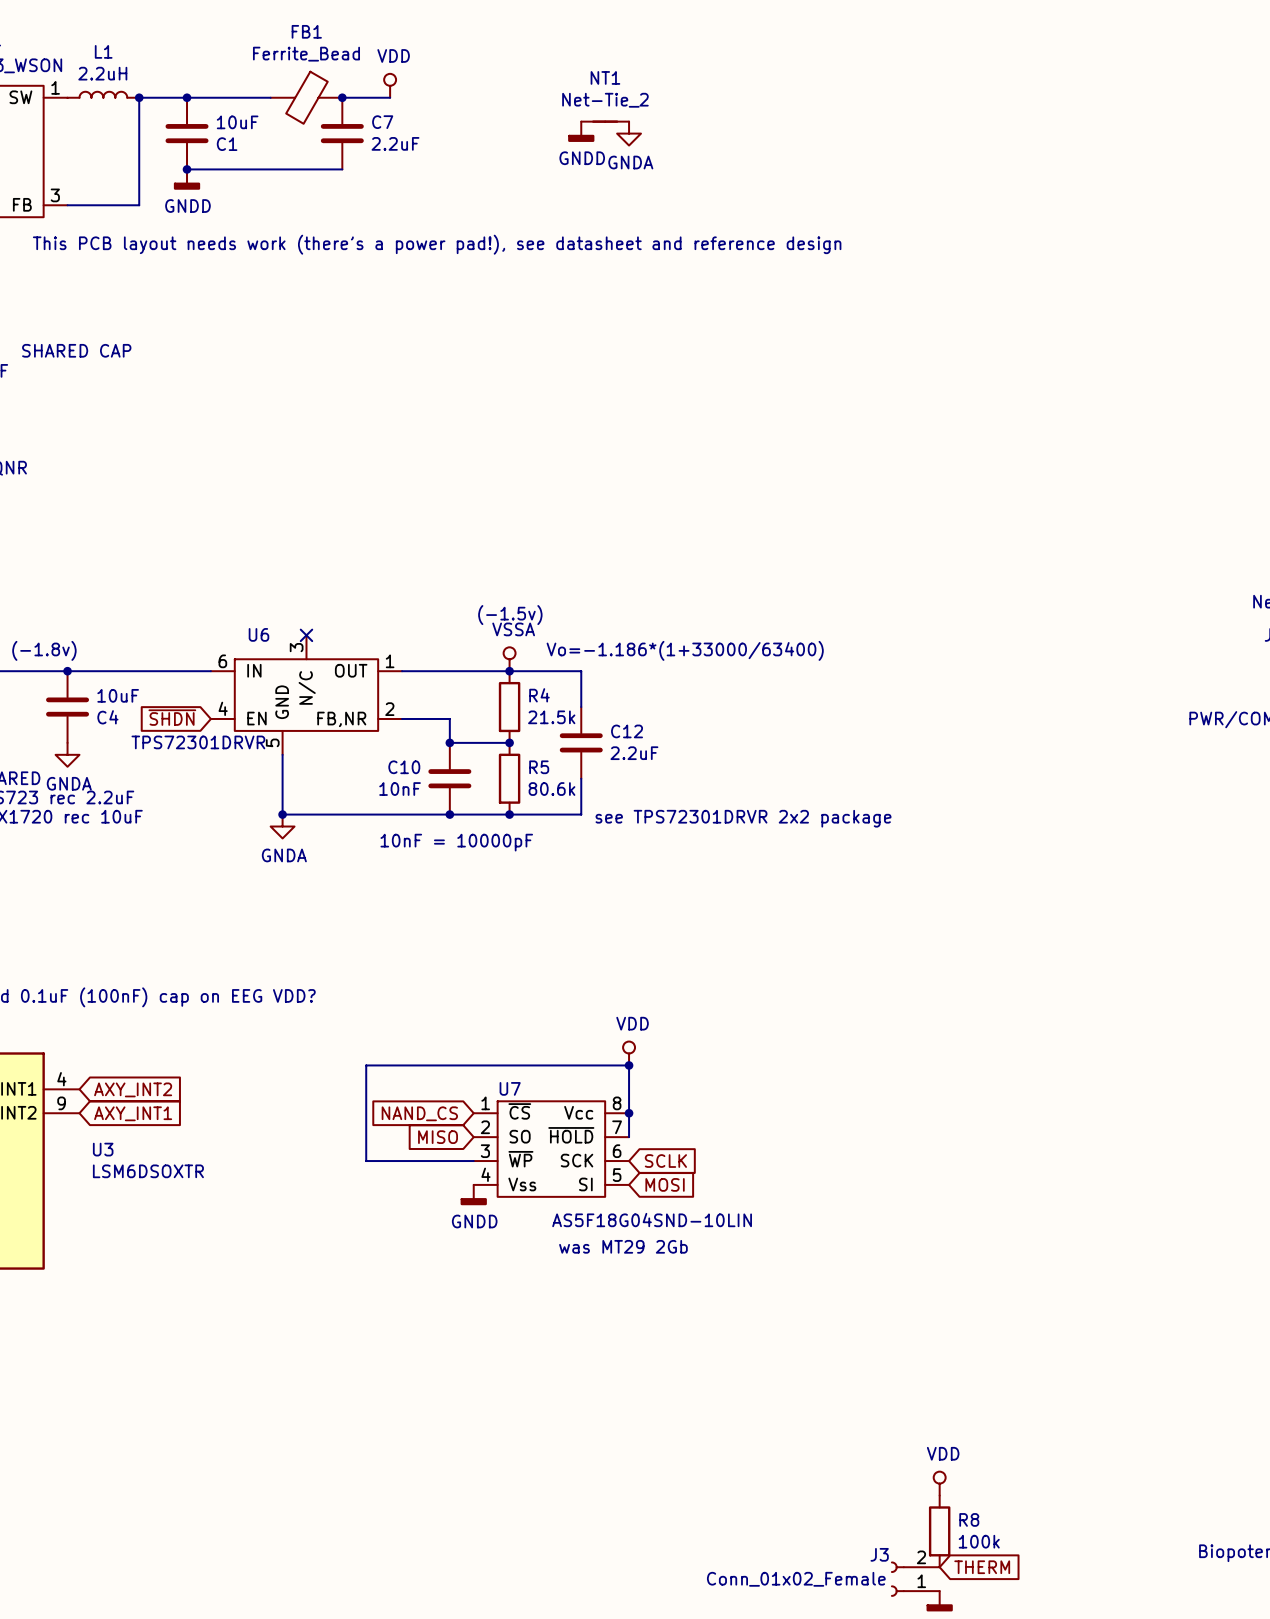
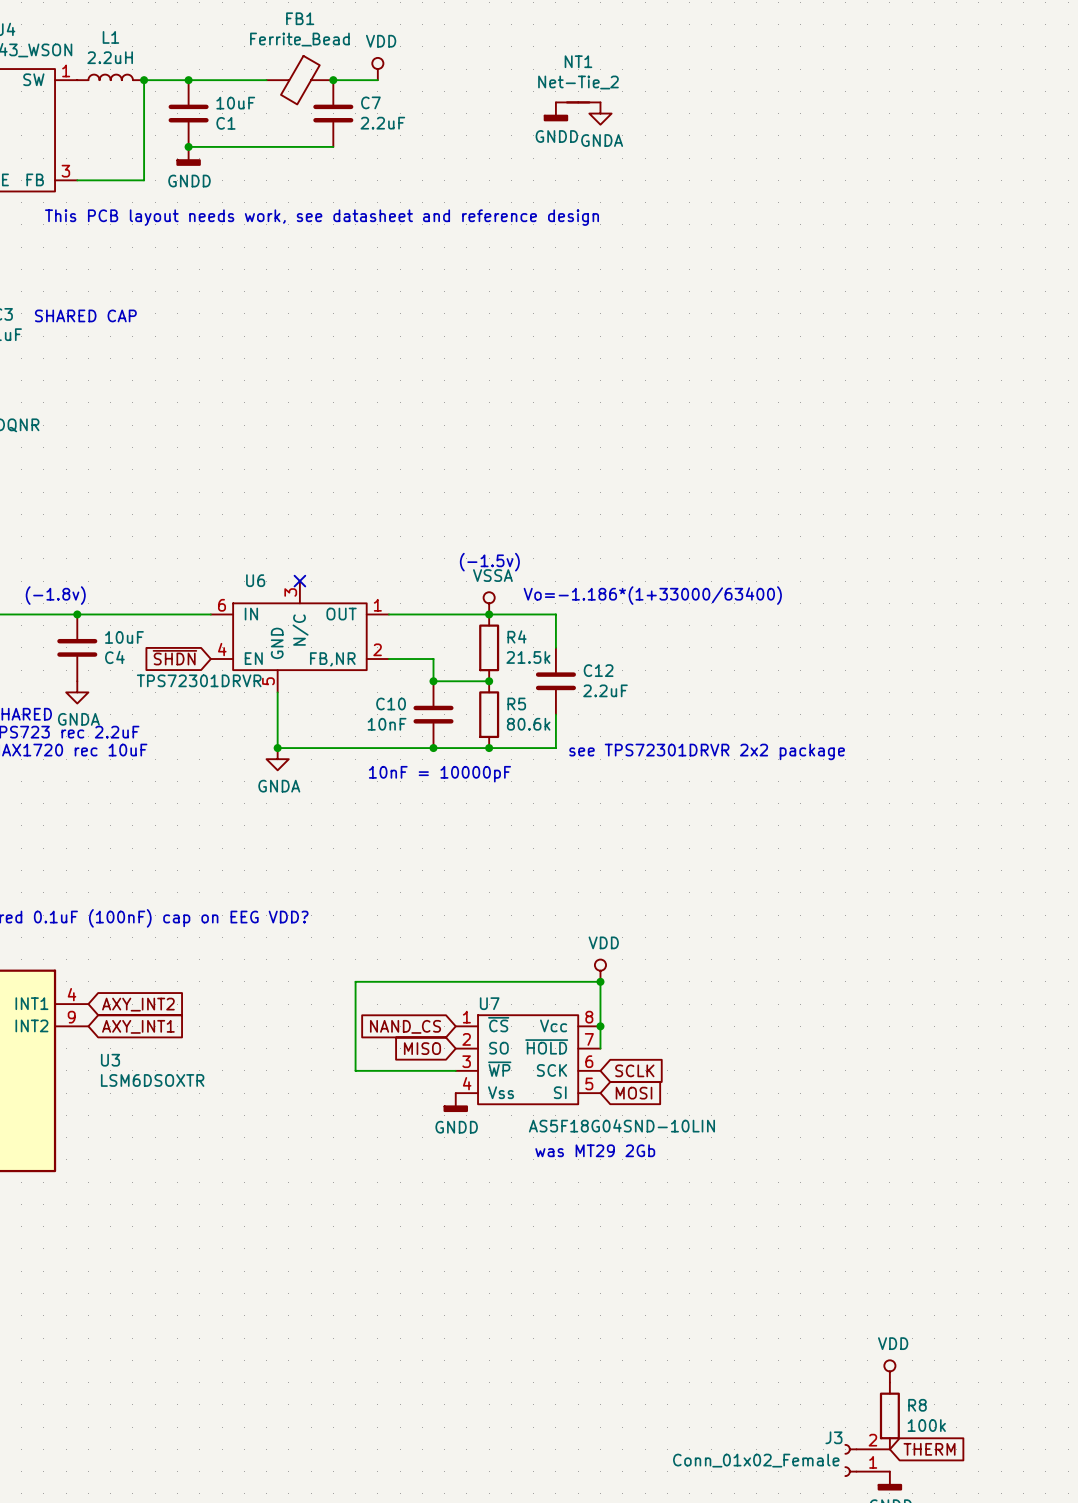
text: This PCB layout needs work (there’s a power pad!), see datasheet and reference design (437, 244) -> This PCB layout needs work, see datasheet and reference design (322, 217)

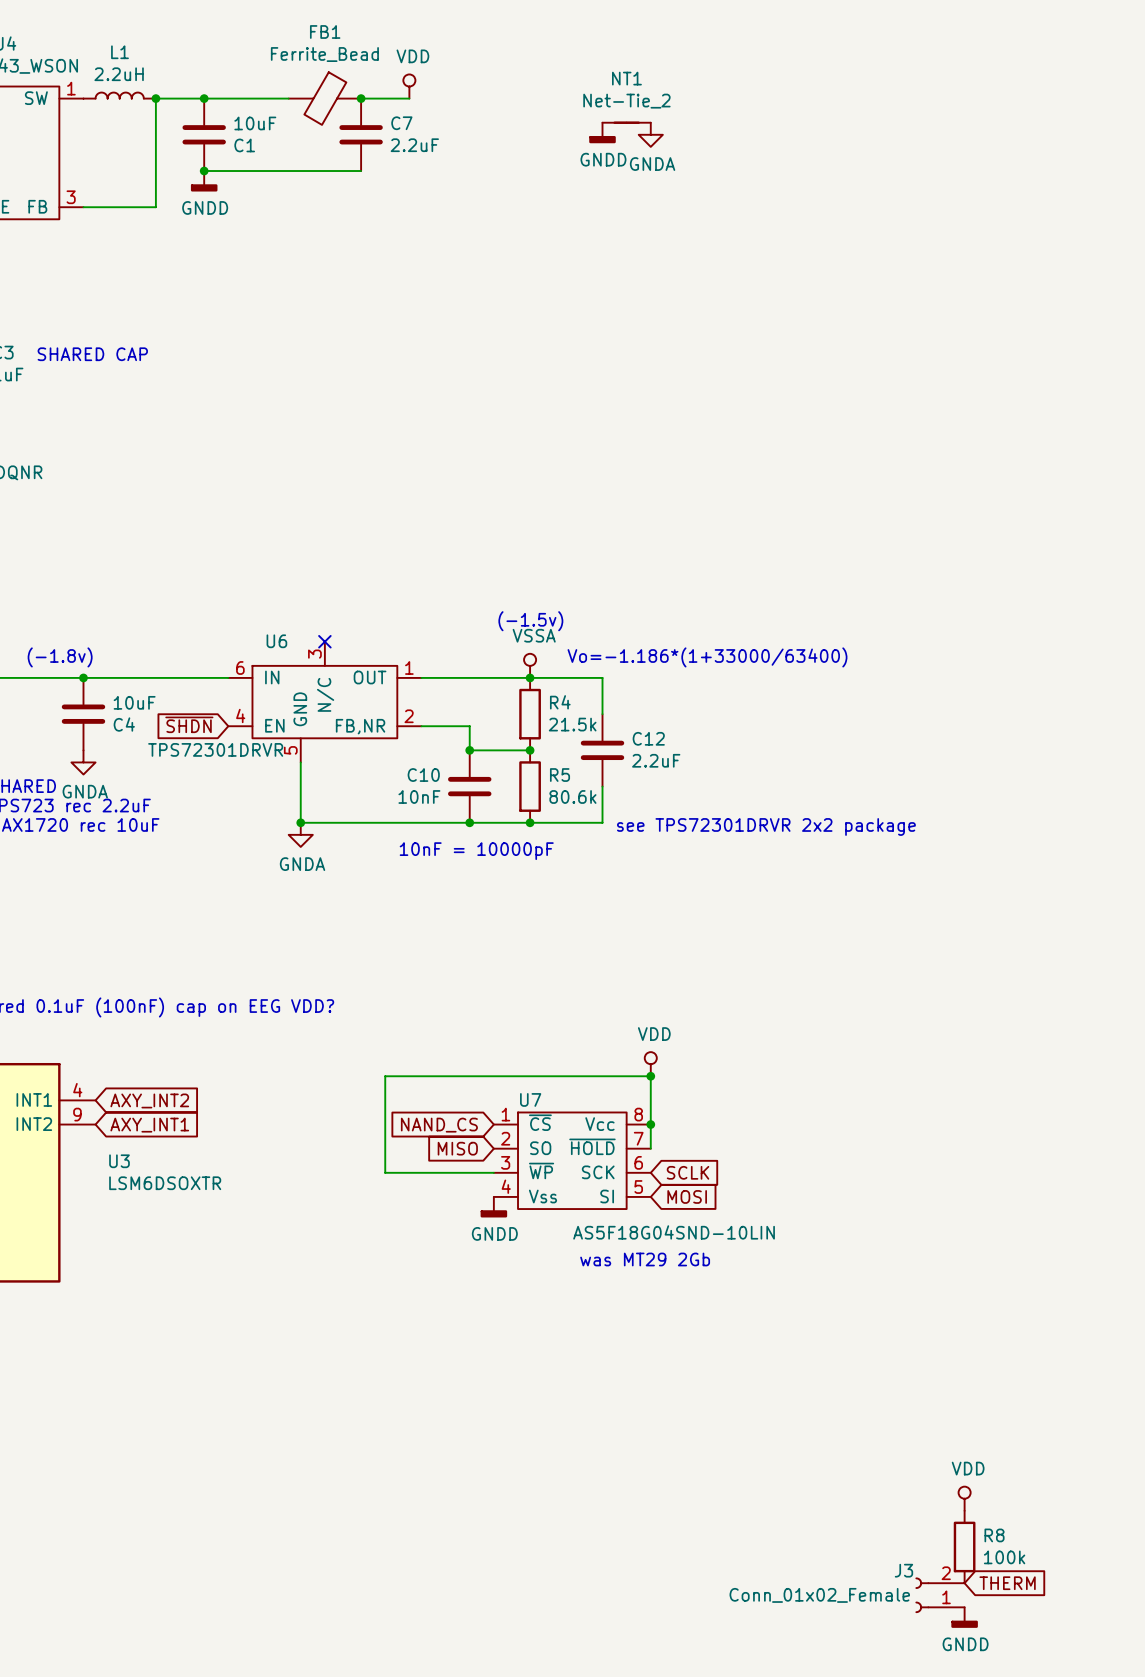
text: This PCB layout needs work, see datasheet and reference design (322, 217) -> none

